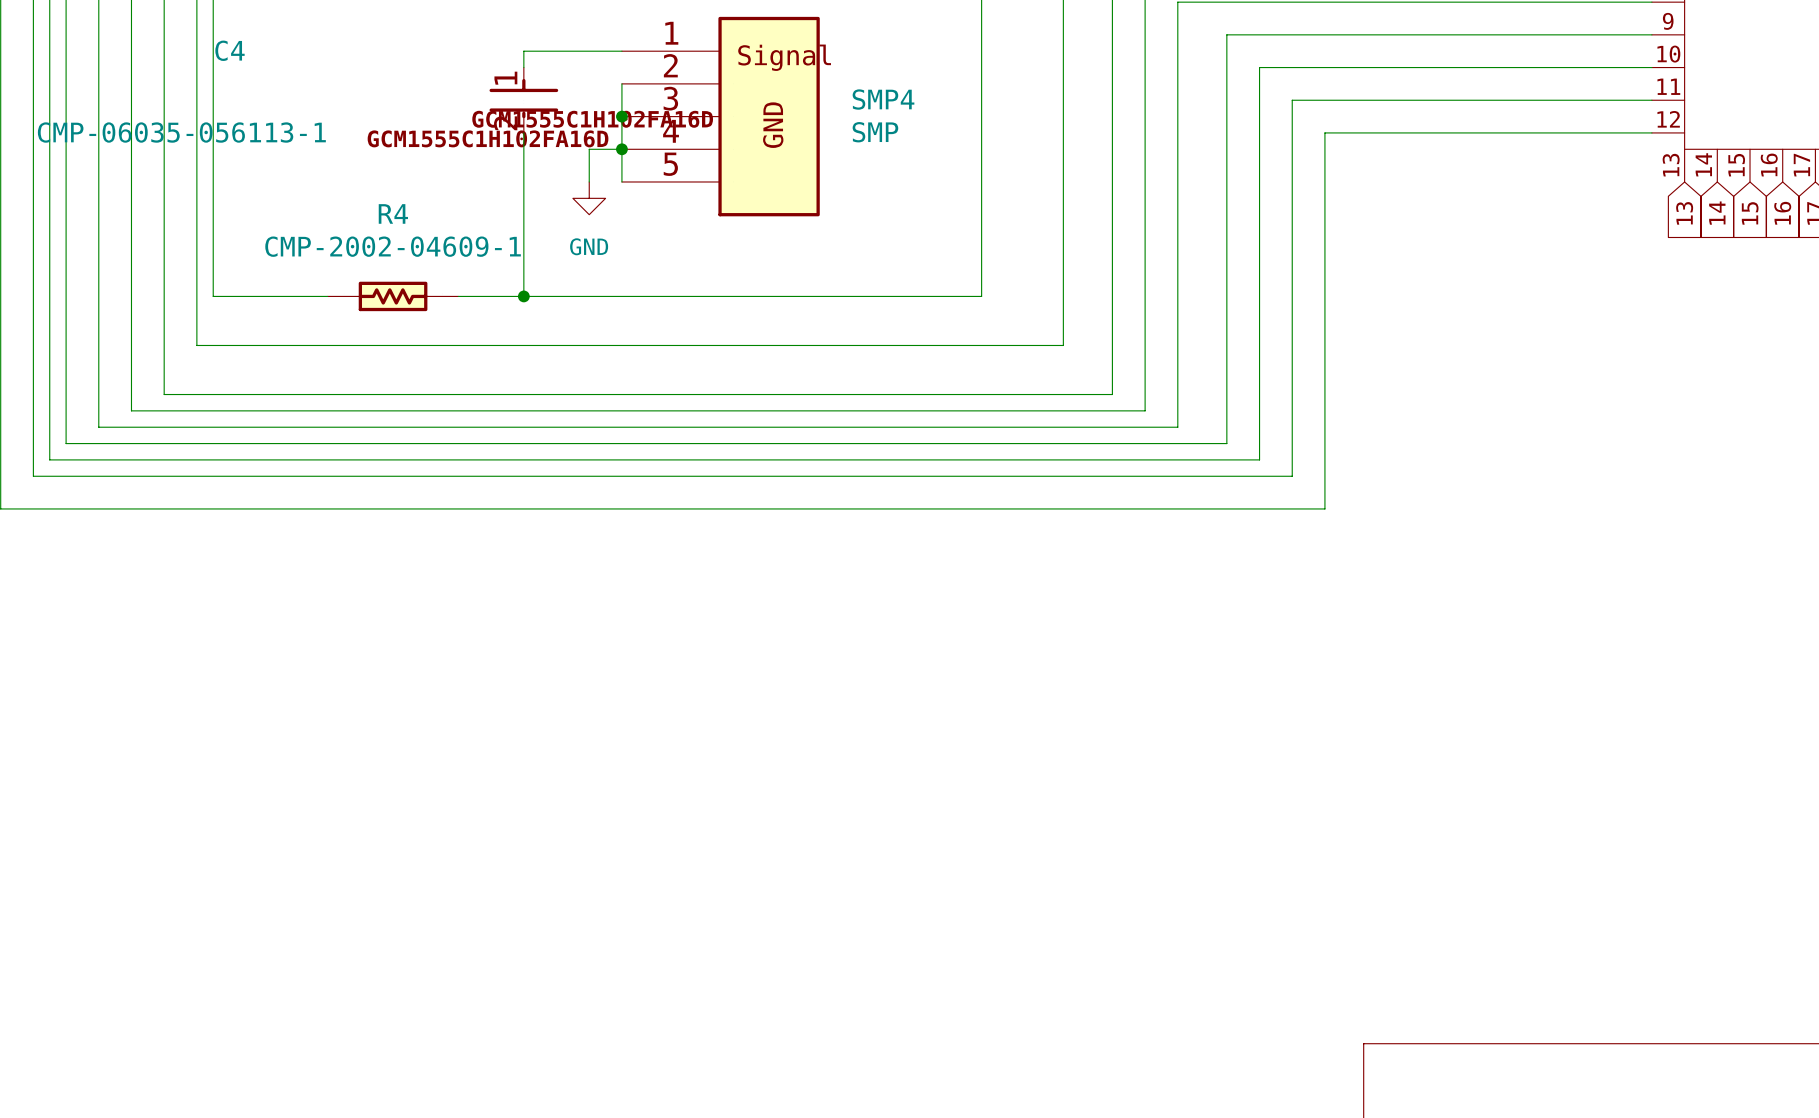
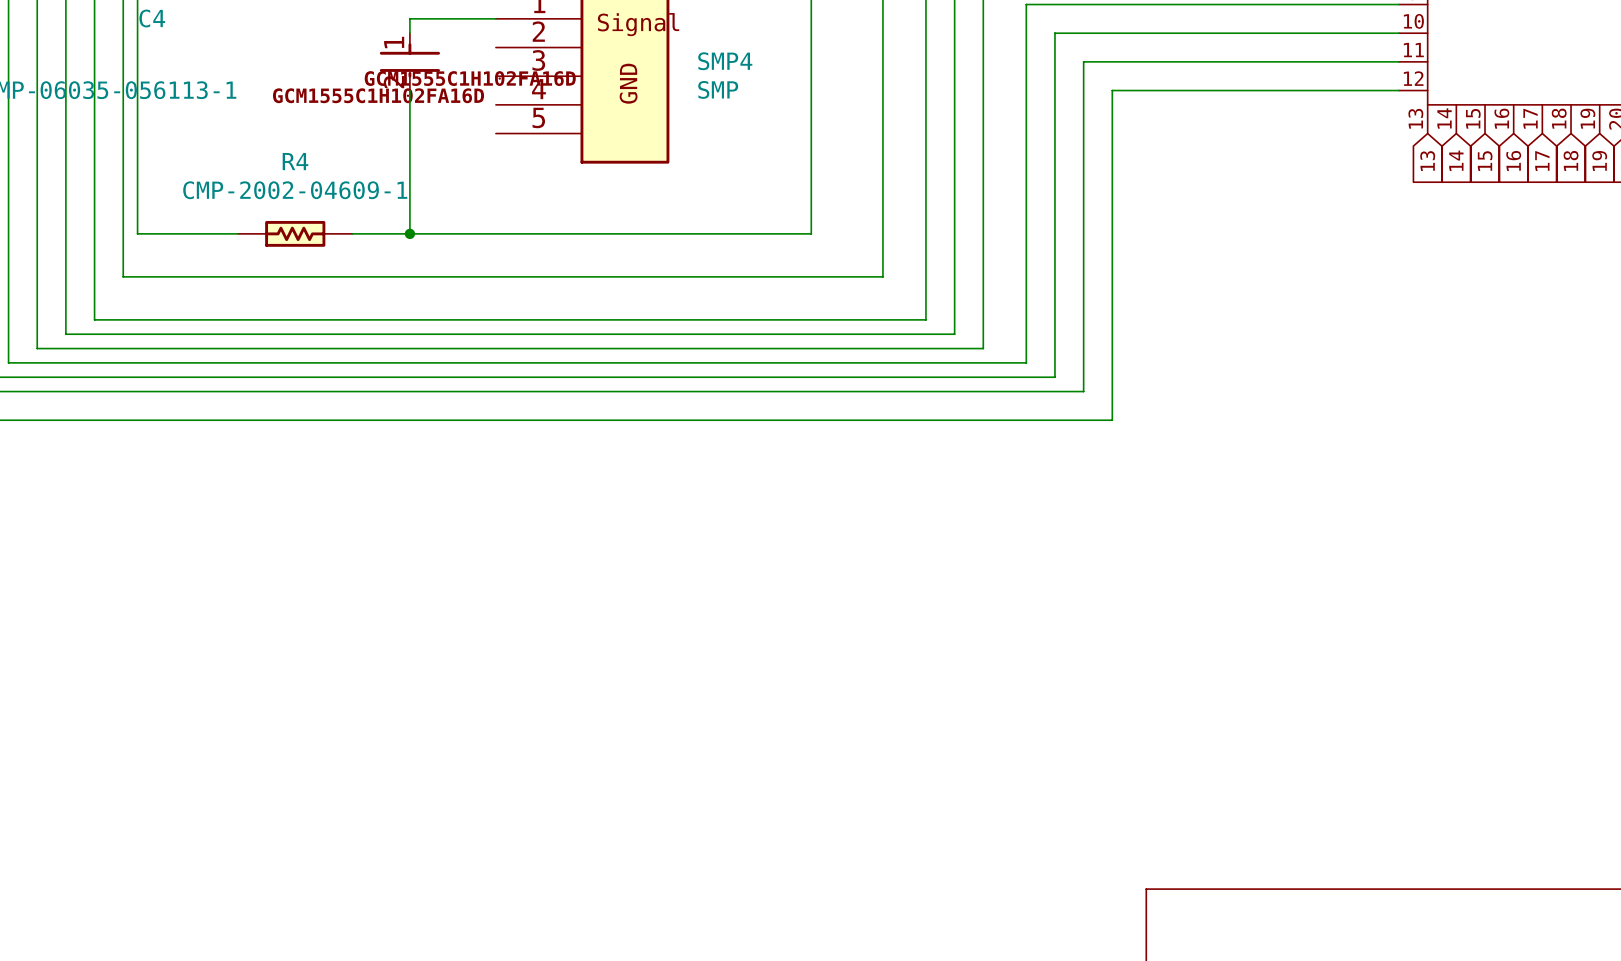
wire: (621, 83) (621, 181) -> none
junction: (621, 116) -> none
wire: (621, 149) (589, 149) (589, 181) -> none
junction: (621, 149) -> none
power symbol: GND (589, 198) -> none

